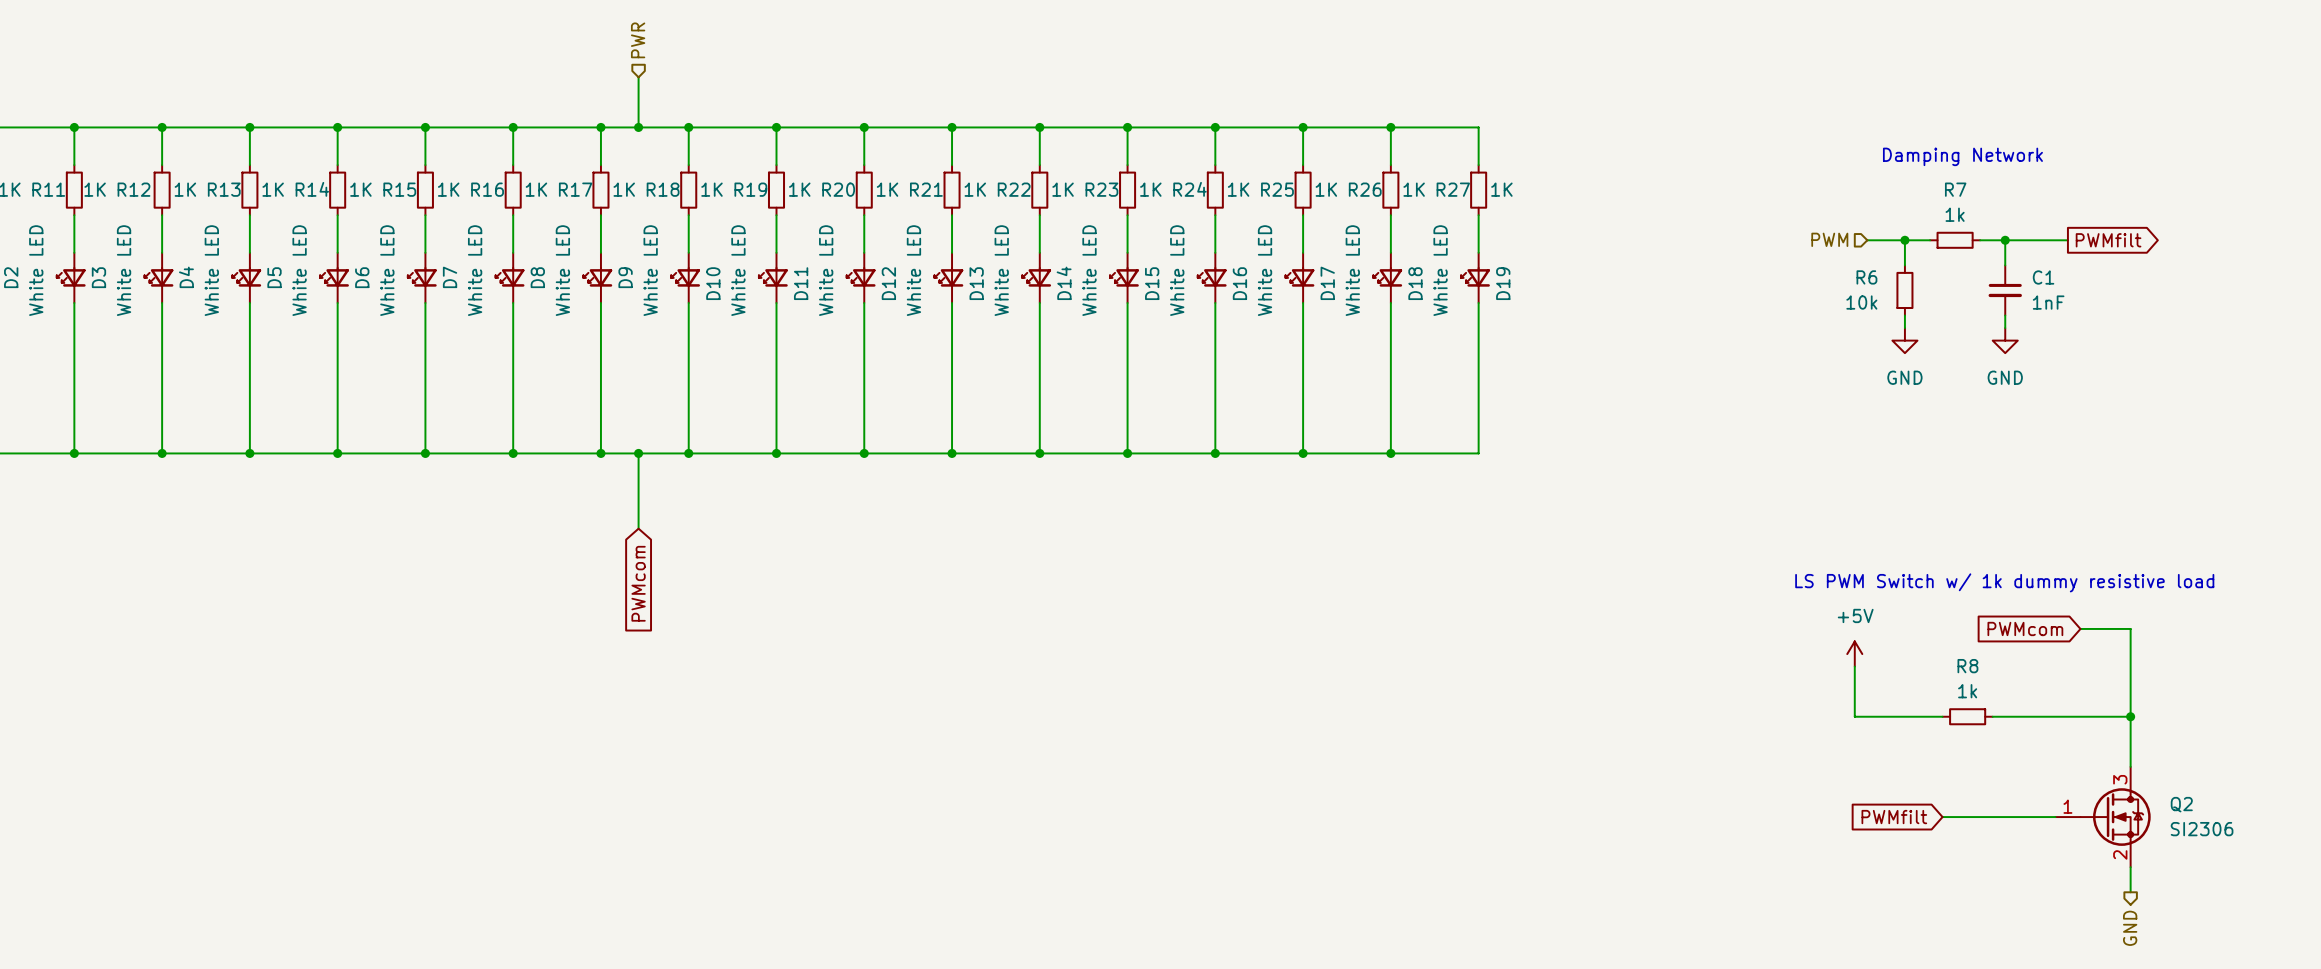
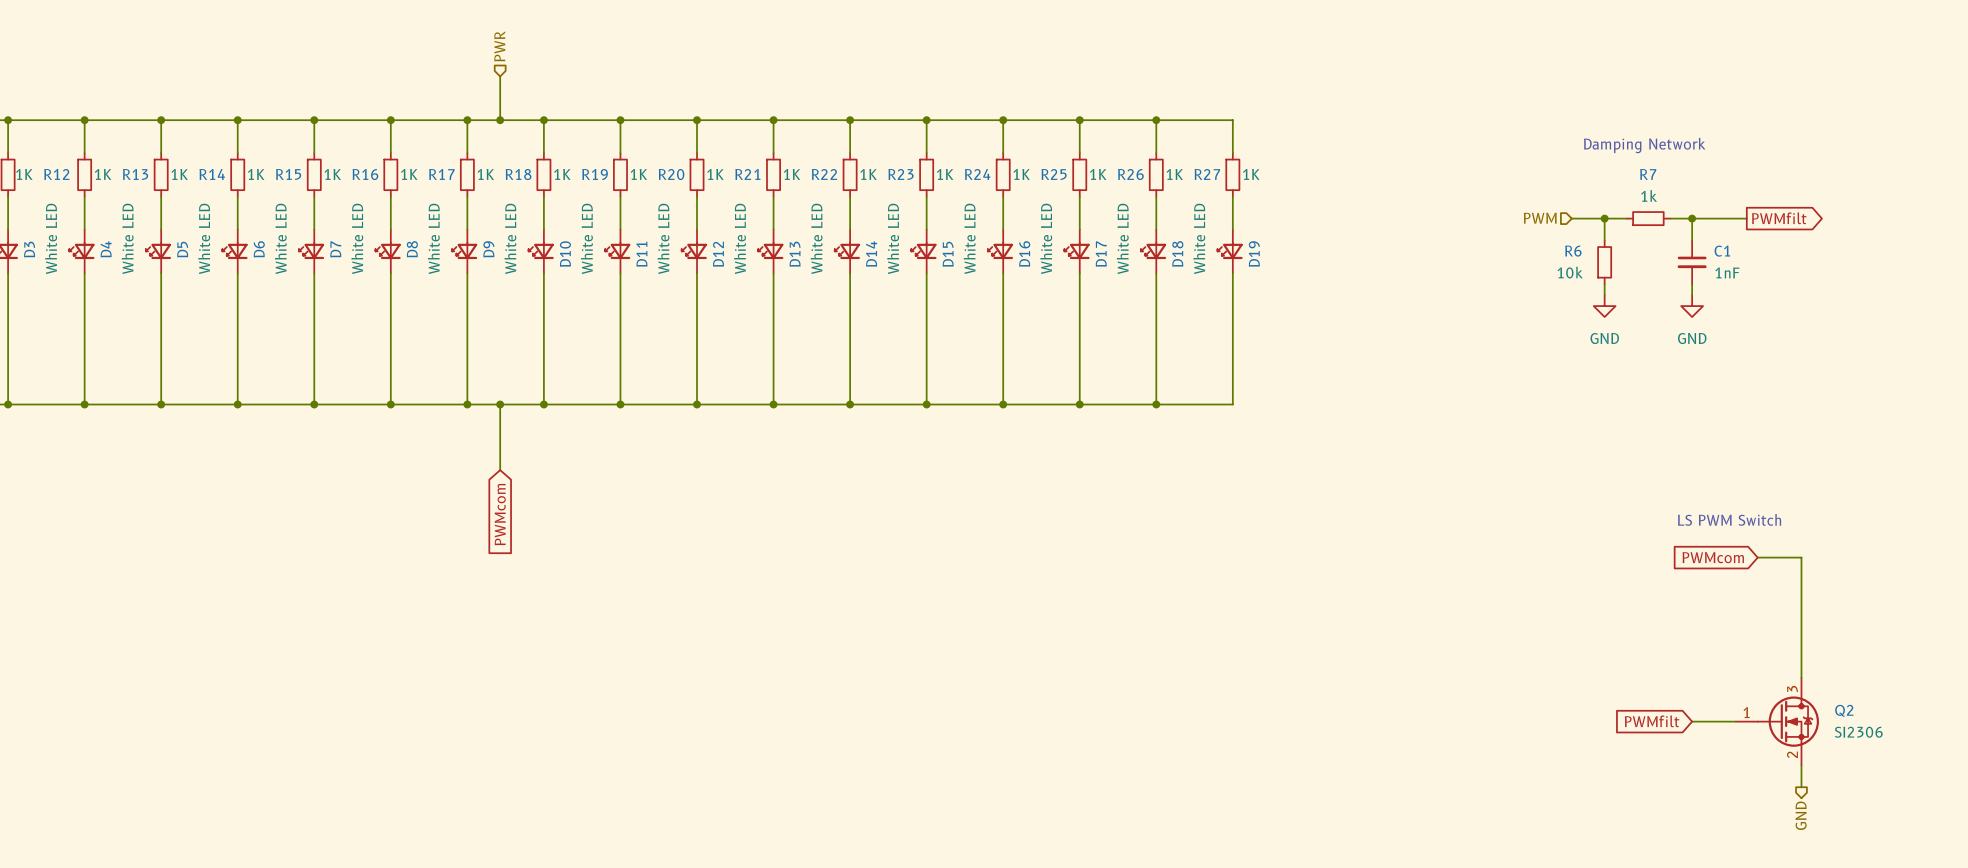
text: LS PWM Switch w/ 1k dummy resistive load (2004, 582) -> none
text: none -> LS PWM Switch (1729, 519)
power symbol: +5V (1854, 654) -> none
wire: (1854, 666) (1854, 716) (1942, 716) -> none
R8: 1k (1967, 716) -> none
wire: (1992, 716) (2130, 716) -> none
junction: (2130, 716) -> none
global label position: PWMfilt (1894, 817) -> PWMfilt (1652, 721)
wire: (1942, 817) (2005, 817) -> none

